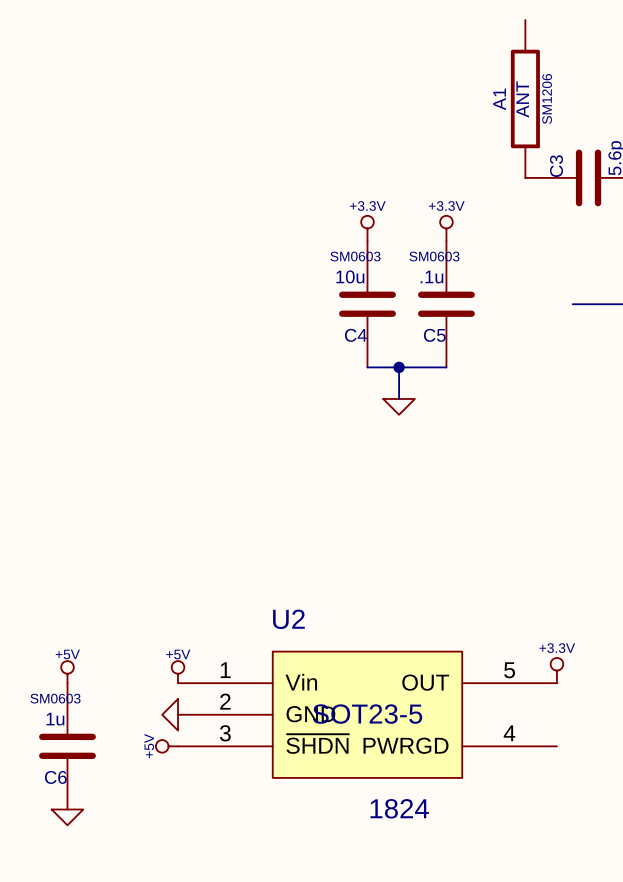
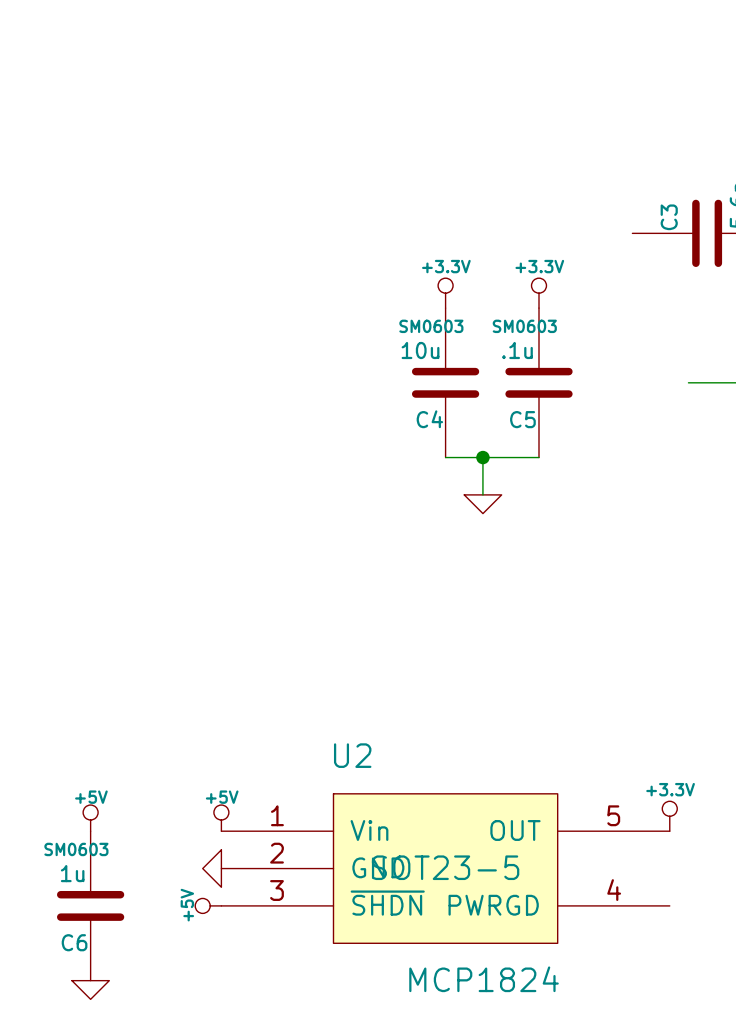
A1: ANT (525, 98) -> none
U2 value: 1824 (399, 808) -> MCP1824 (484, 979)

